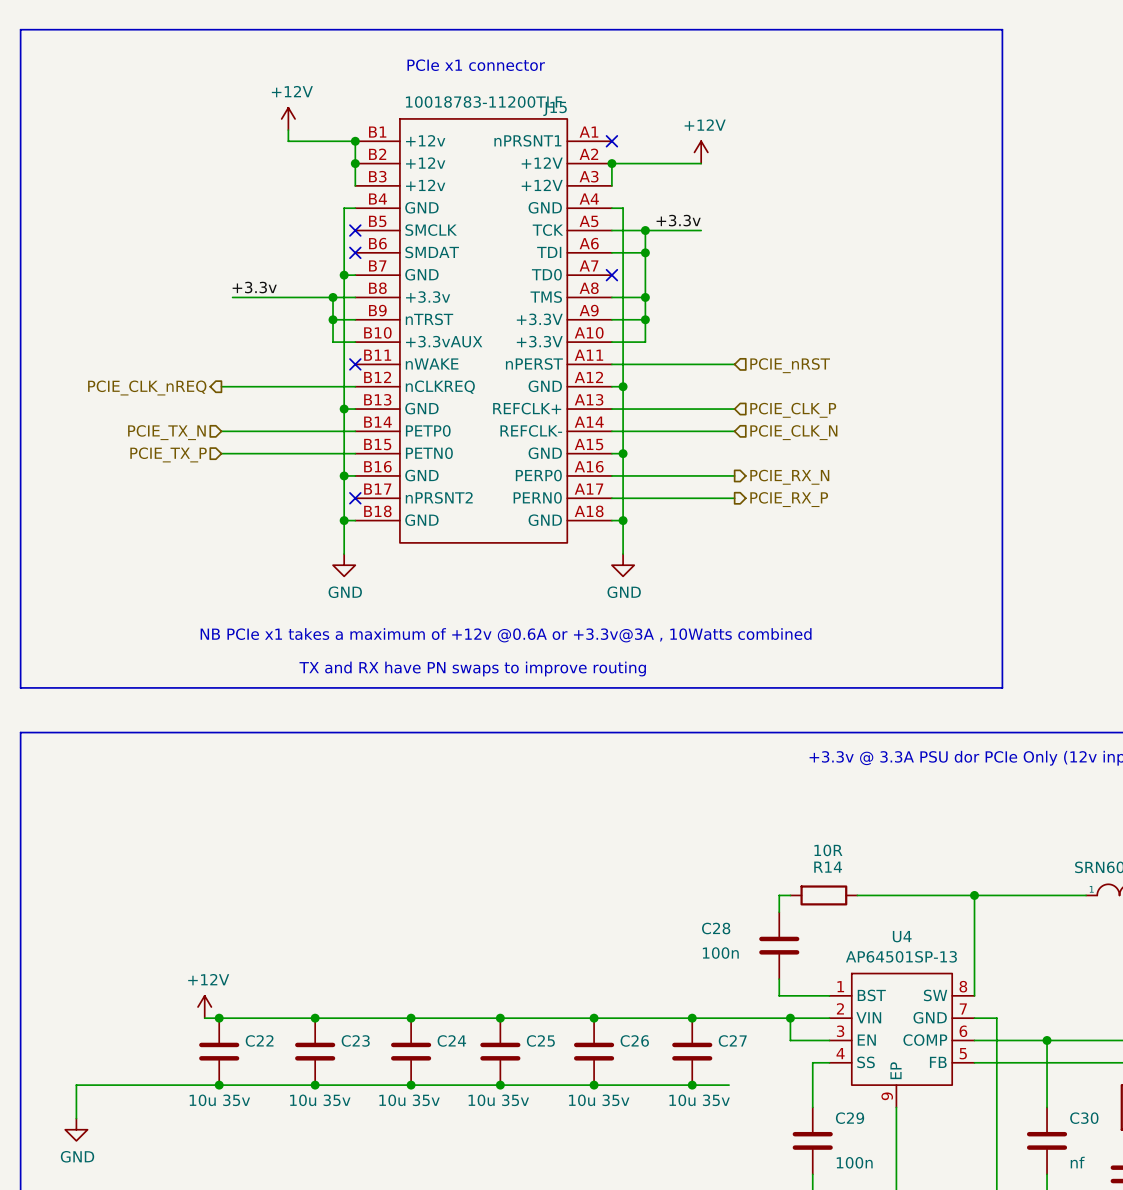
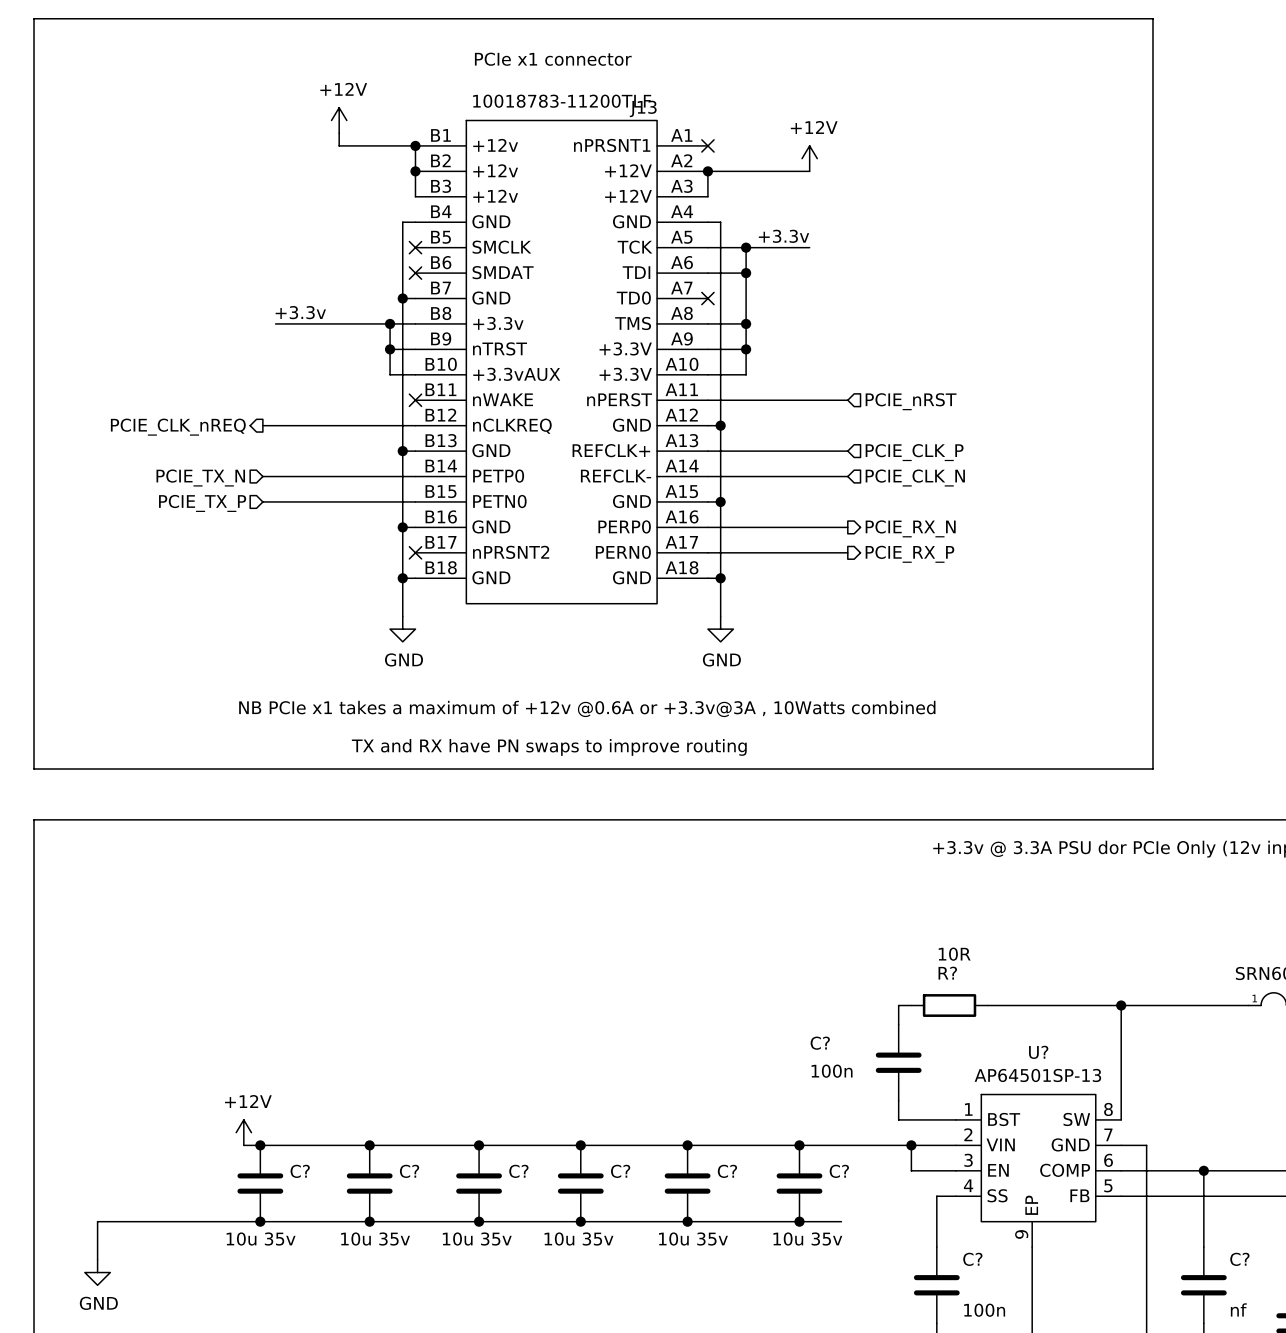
J15 name: J15 (555, 108) -> J13 (643, 108)
R14 name: R14 (828, 867) -> R? (947, 973)
C28 name: C28 (716, 928) -> C? (820, 1043)
U4 name: U4 (902, 936) -> U? (1038, 1052)
C22 name: C22 (259, 1040) -> C? (300, 1171)
C23 name: C23 (355, 1040) -> C? (409, 1171)
C24 name: C24 (451, 1040) -> C? (518, 1171)
C25 name: C25 (540, 1040) -> C? (620, 1171)
C26 name: C26 (634, 1040) -> C? (727, 1171)
C27 name: C27 (732, 1040) -> C? (839, 1171)
C29 name: C29 (850, 1118) -> C? (972, 1259)
C30 name: C30 (1084, 1118) -> C? (1239, 1259)

